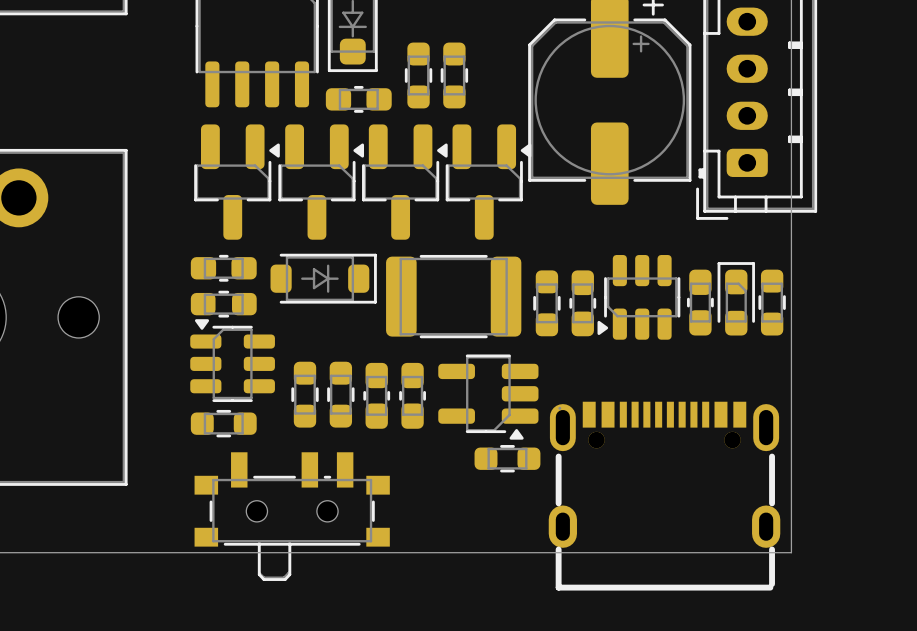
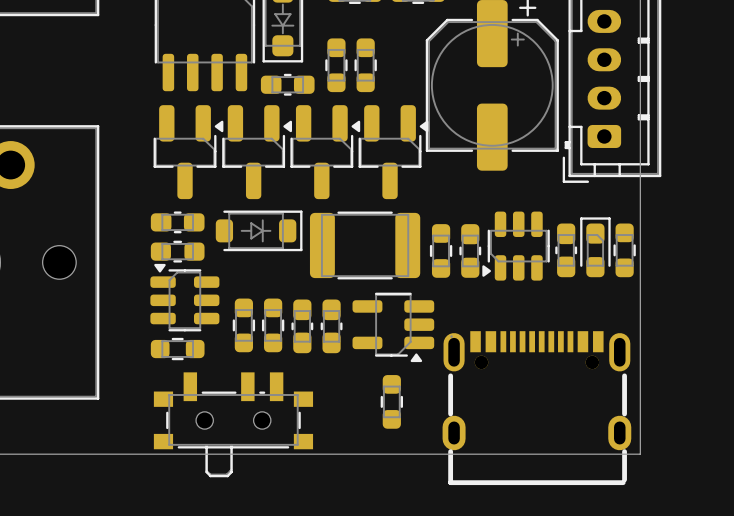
part rotation: 0° (507, 458) -> 90° clockwise (391, 401)

